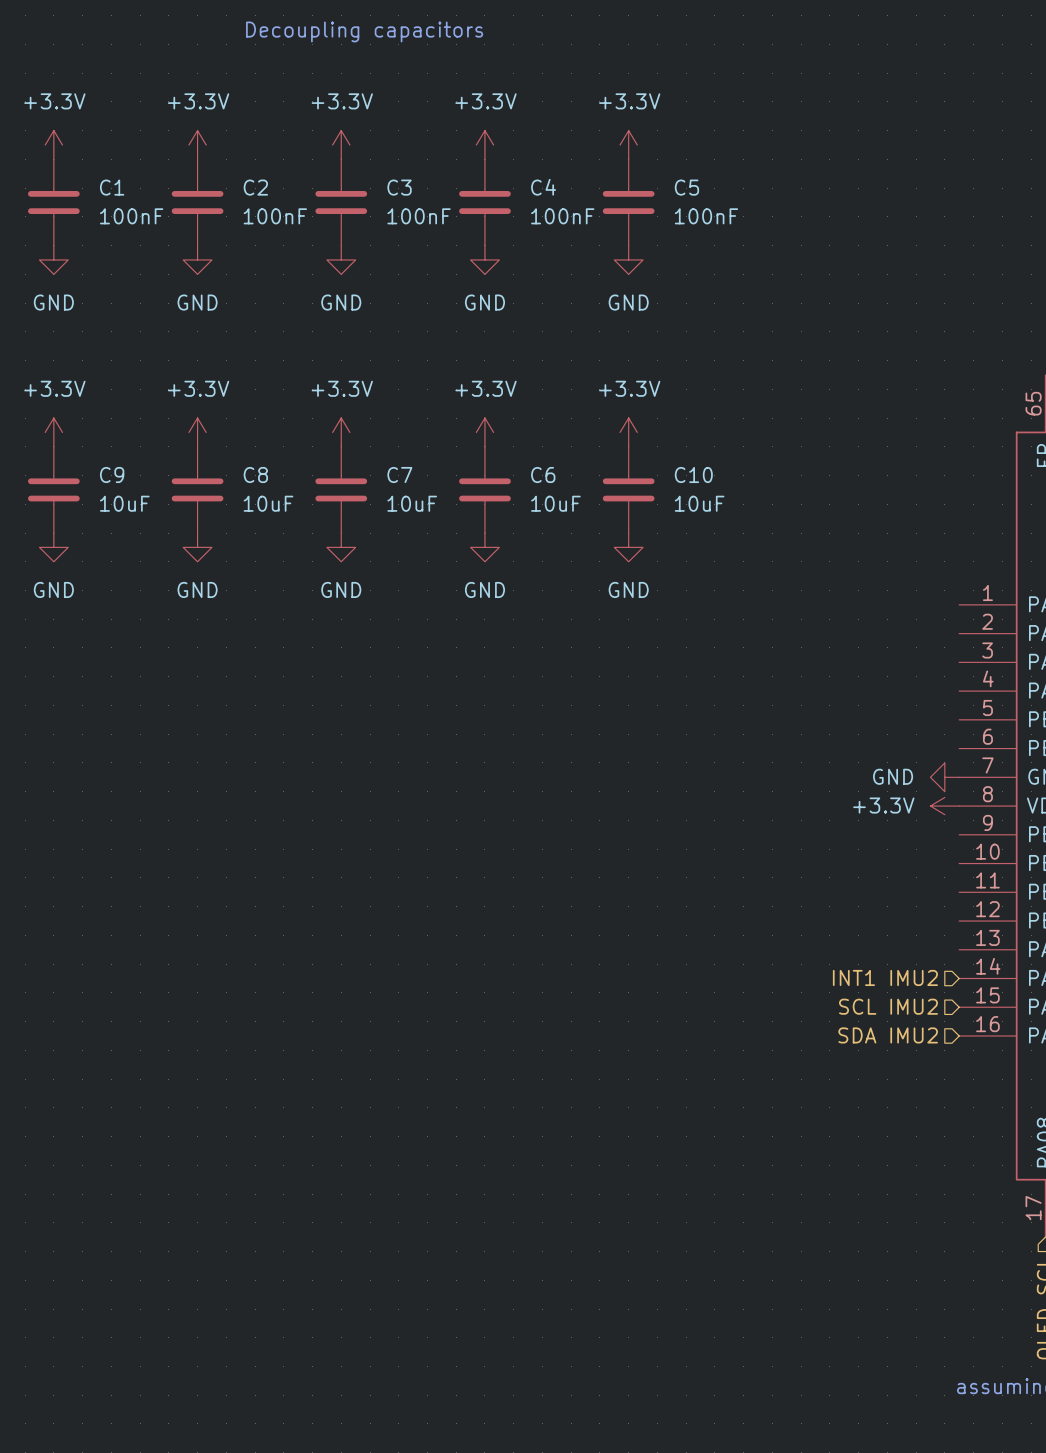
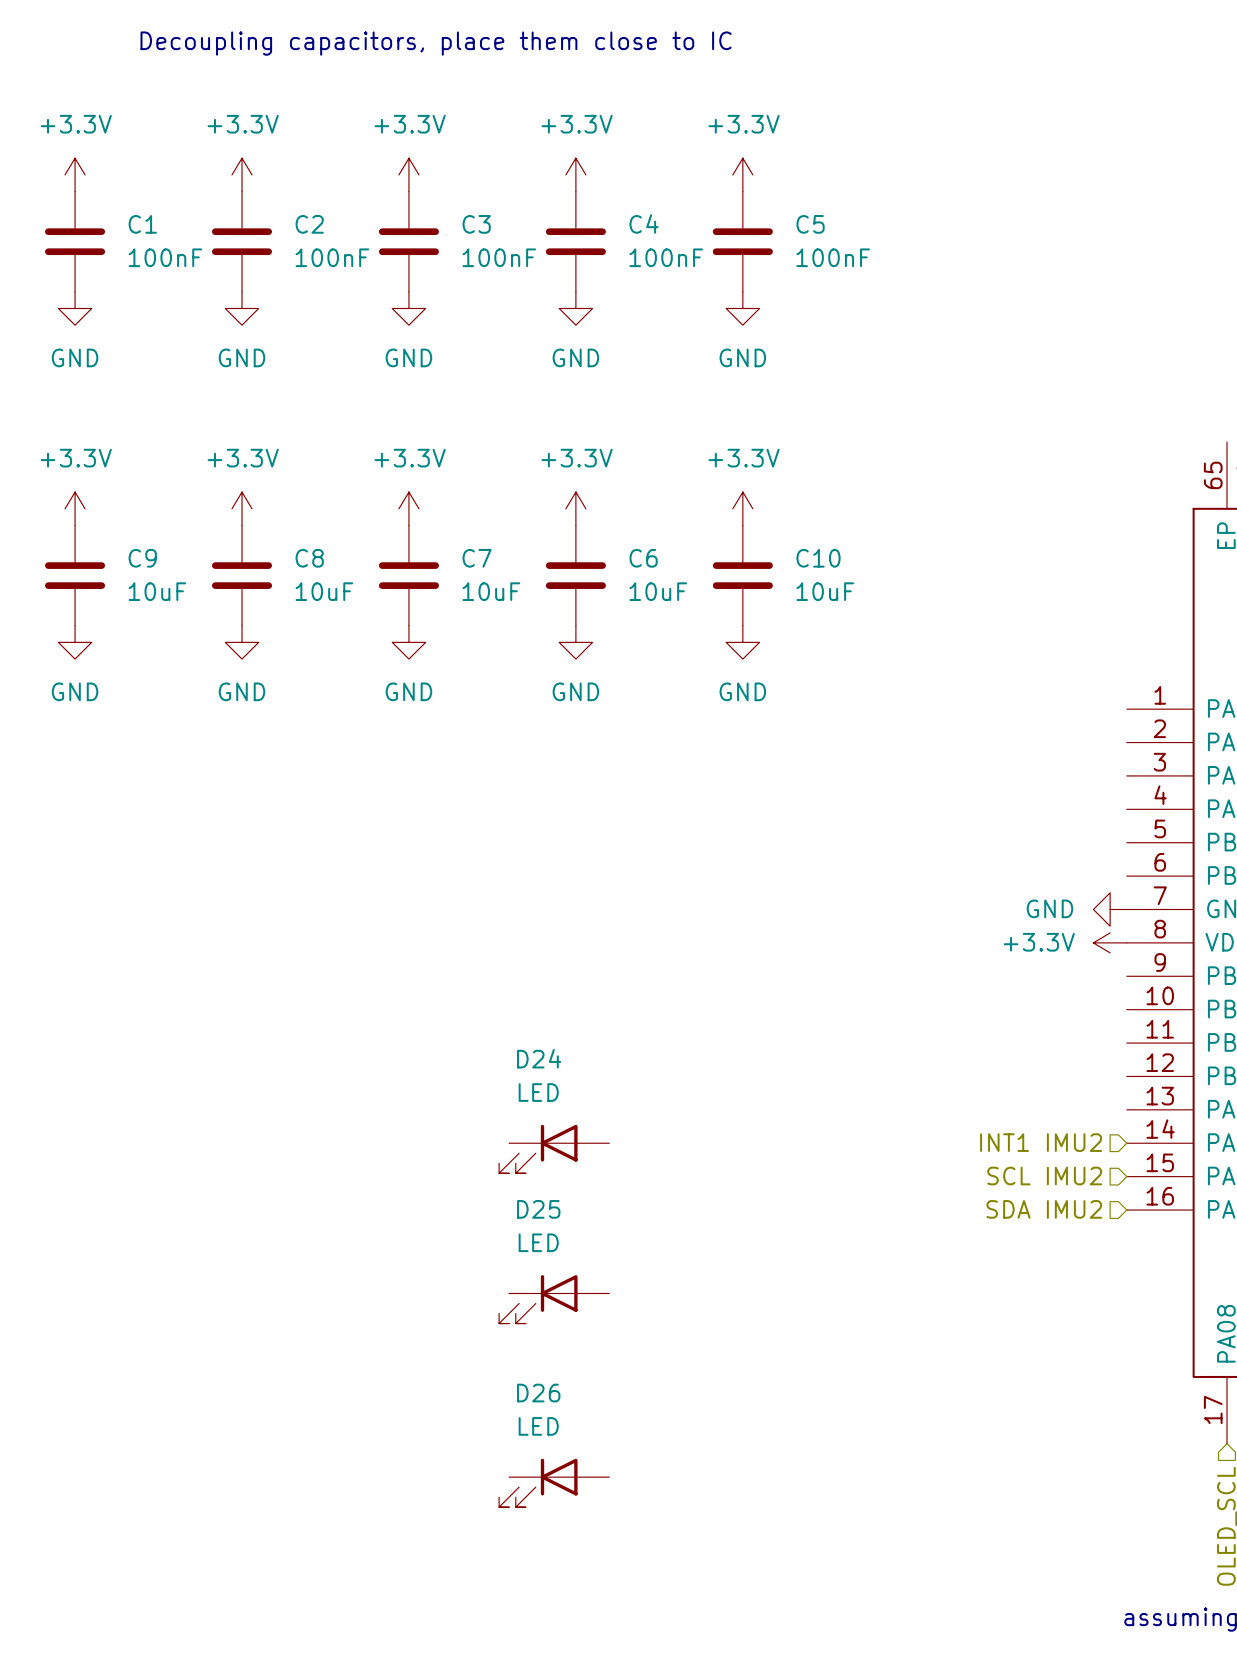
text: Decoupling capacitors (364, 31) -> Decoupling capacitors, place them close to IC (436, 43)
D24: none -> LED (554, 1149)
D25: none -> LED (554, 1299)
D26: none -> LED (554, 1482)

